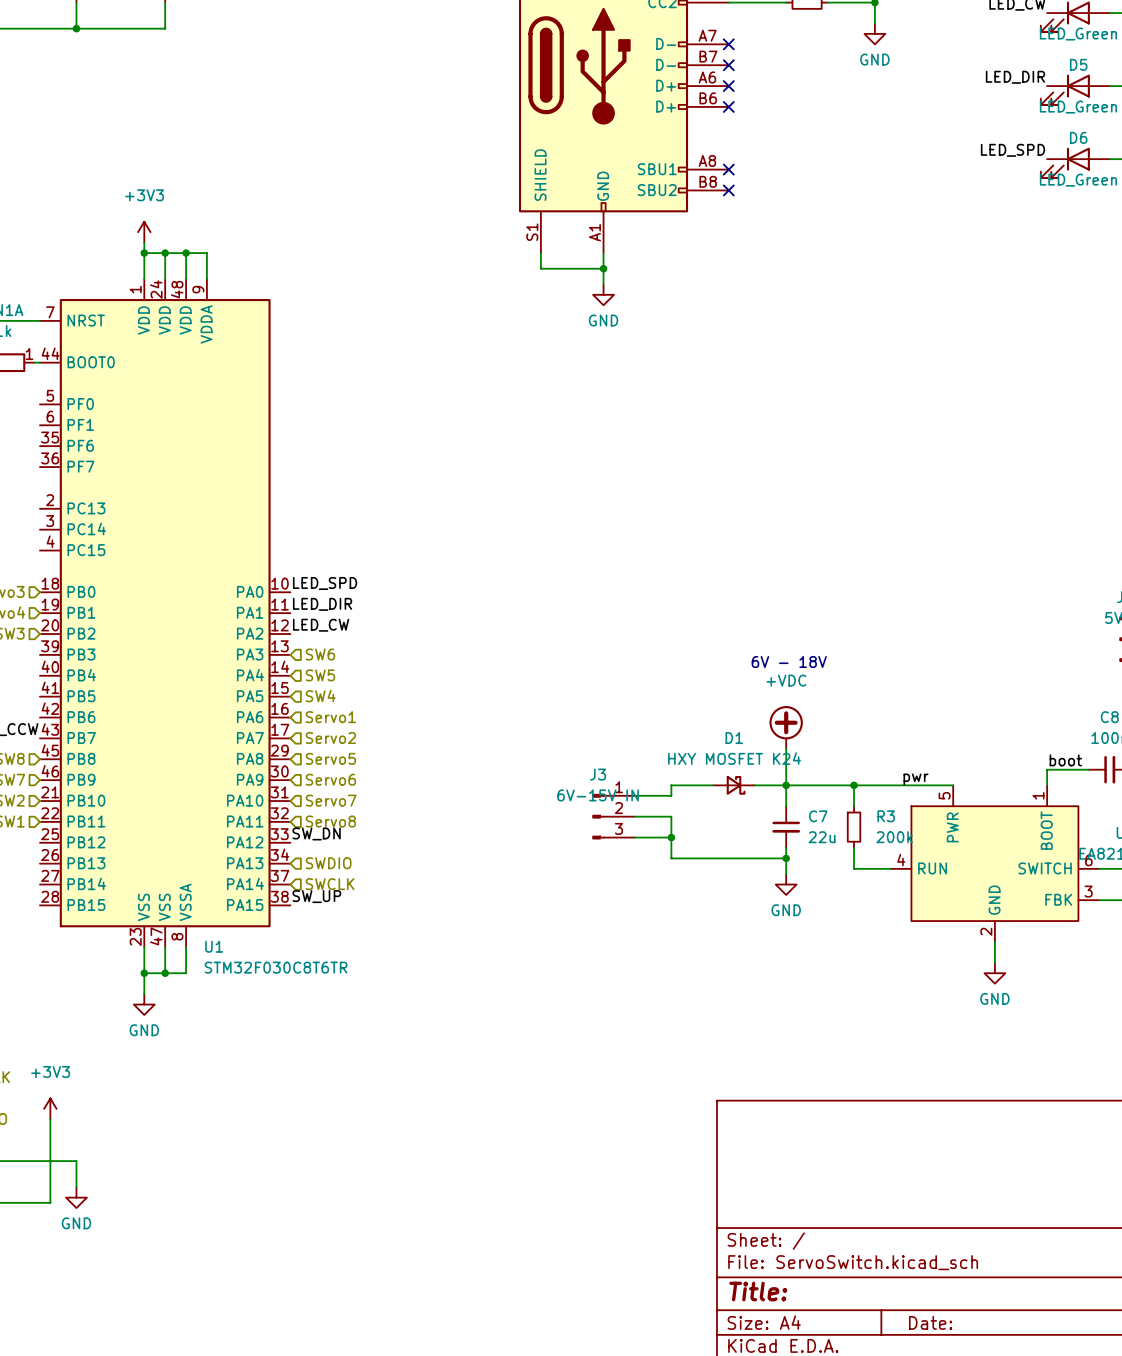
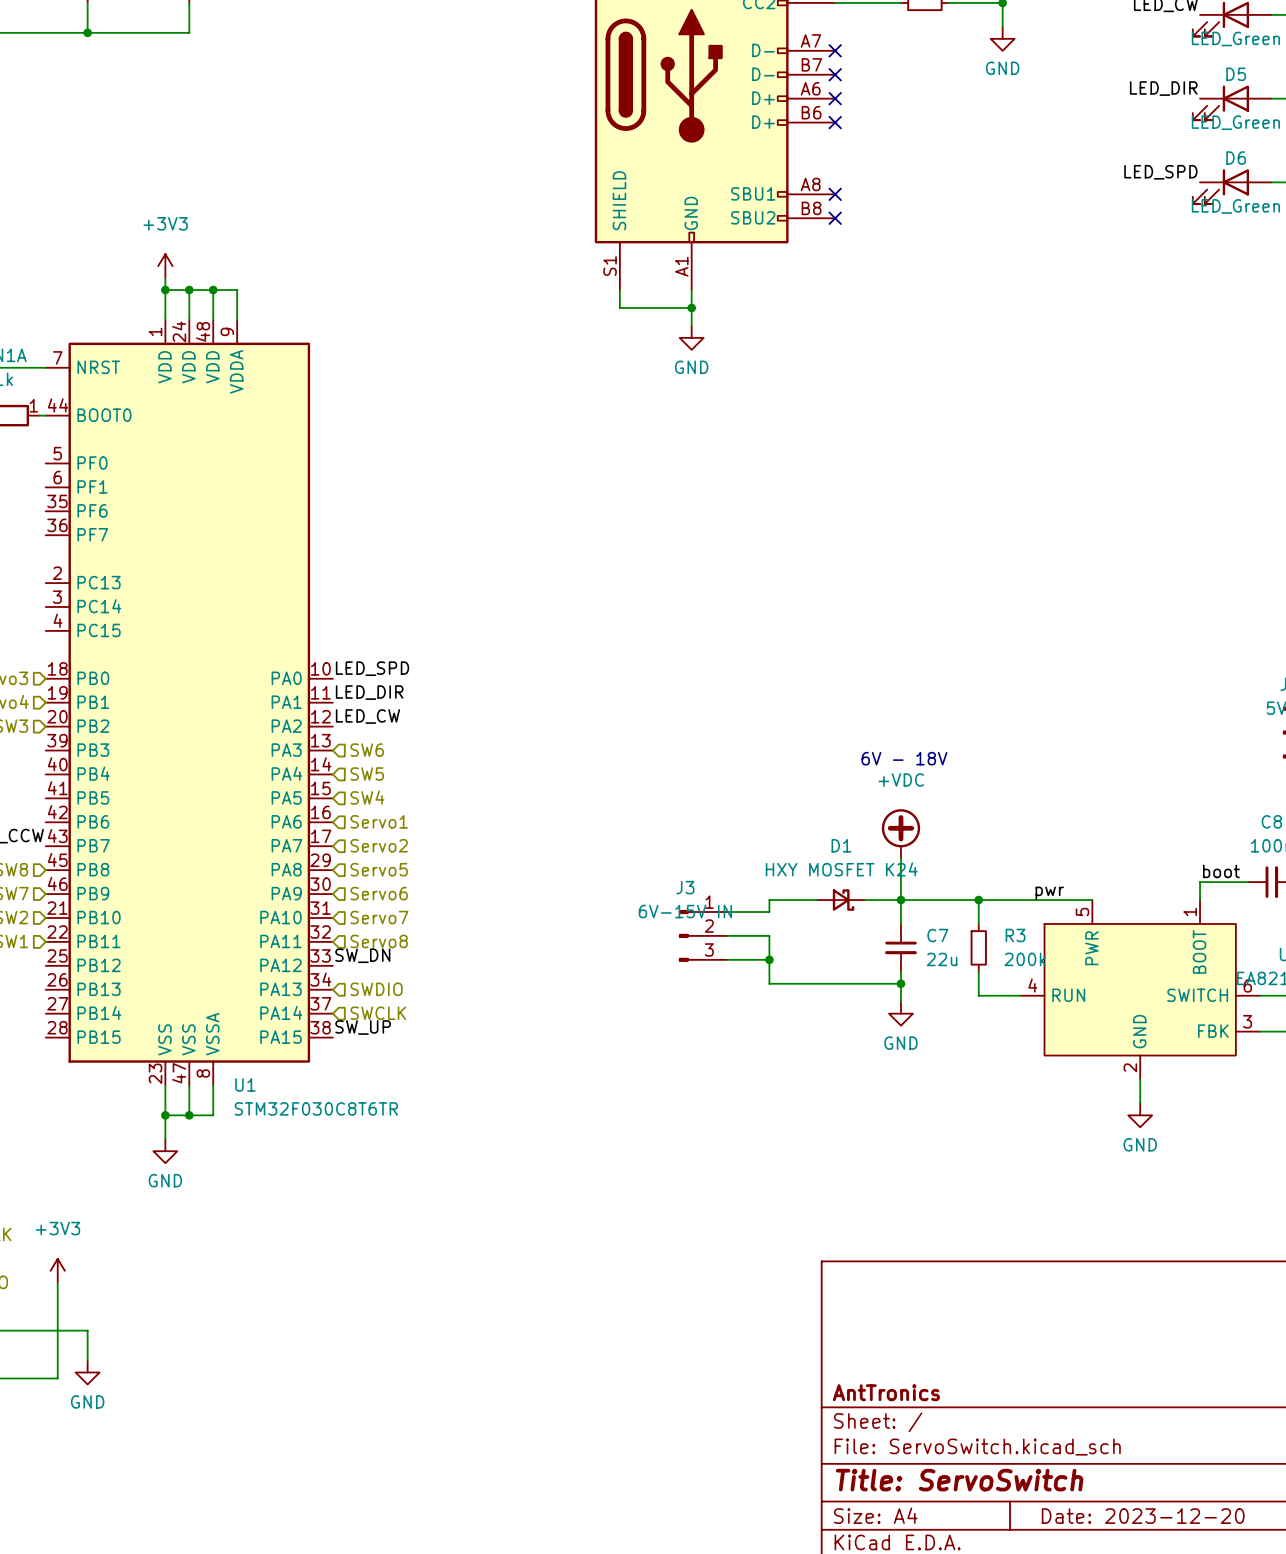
title block: none -> AntTronics (886, 1392)
title block: Title: (758, 1291) -> Title: ServoSwitch (959, 1480)
title block: Date: (930, 1322) -> Date: 2023-12-20 (1143, 1516)

